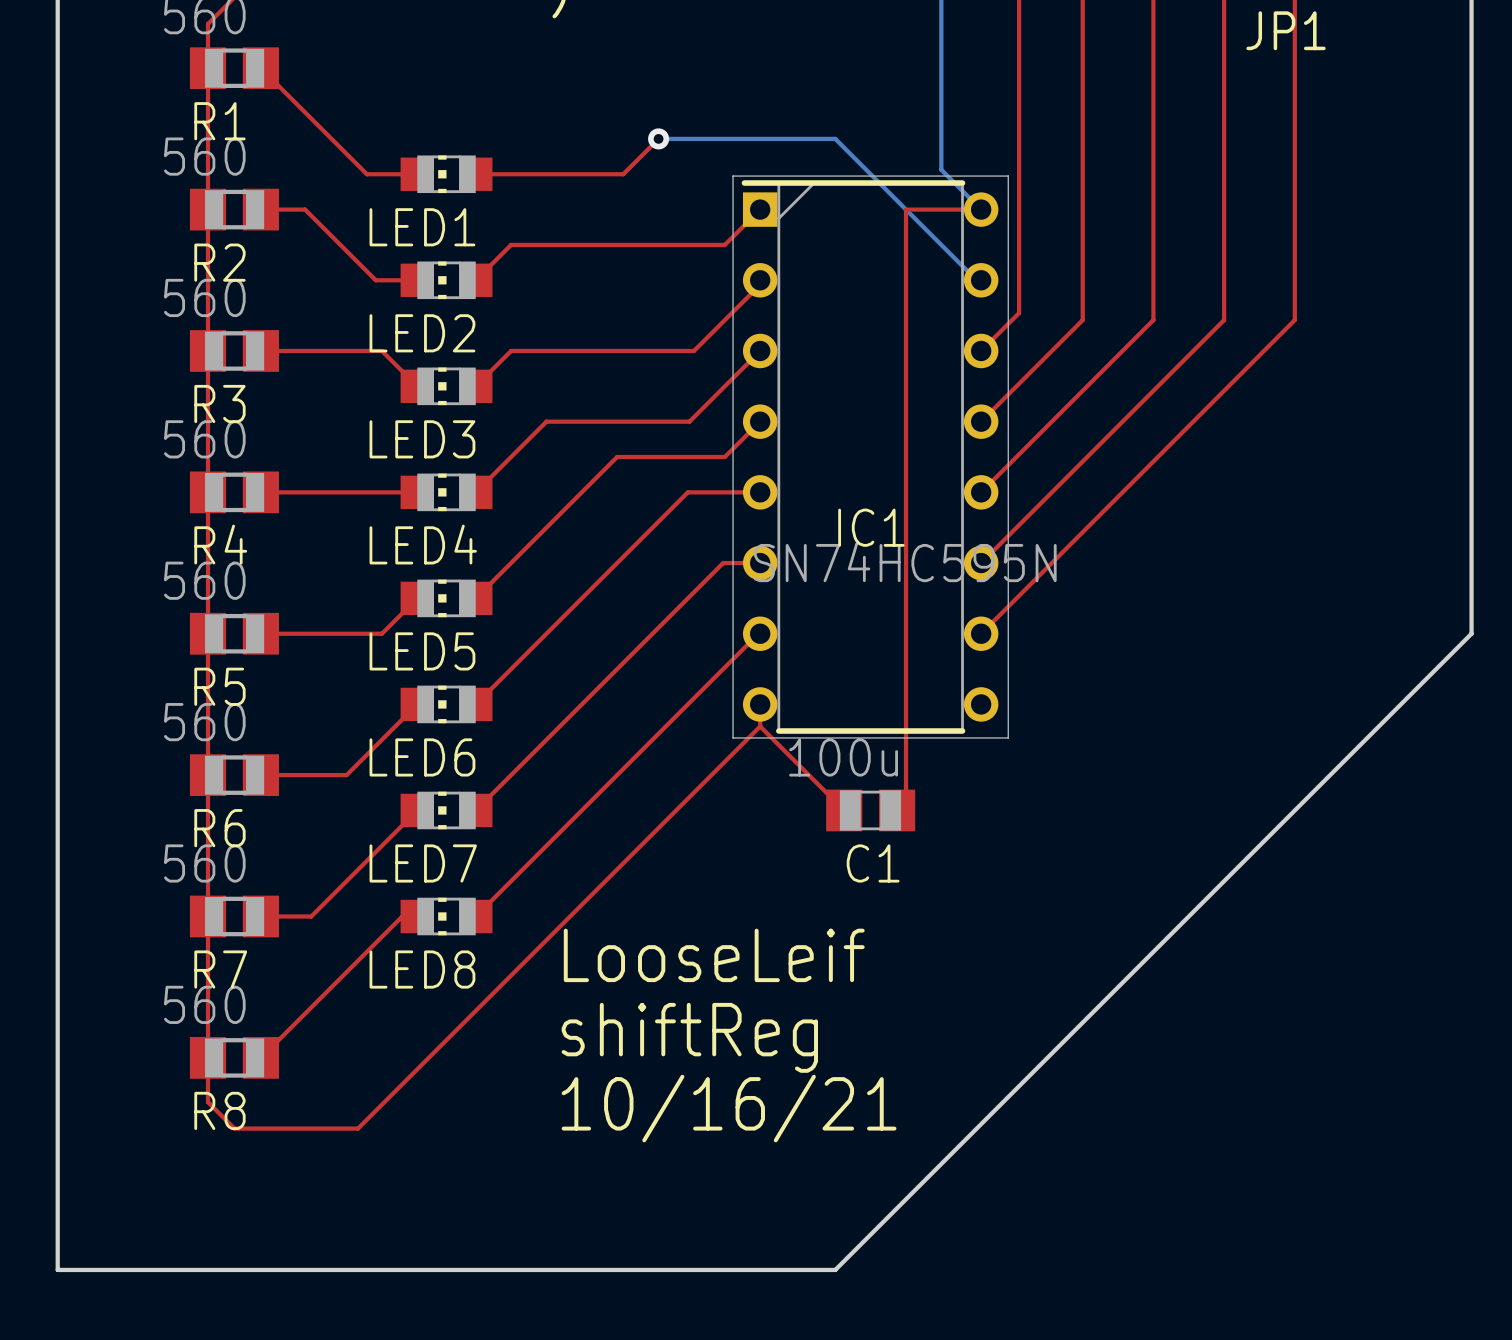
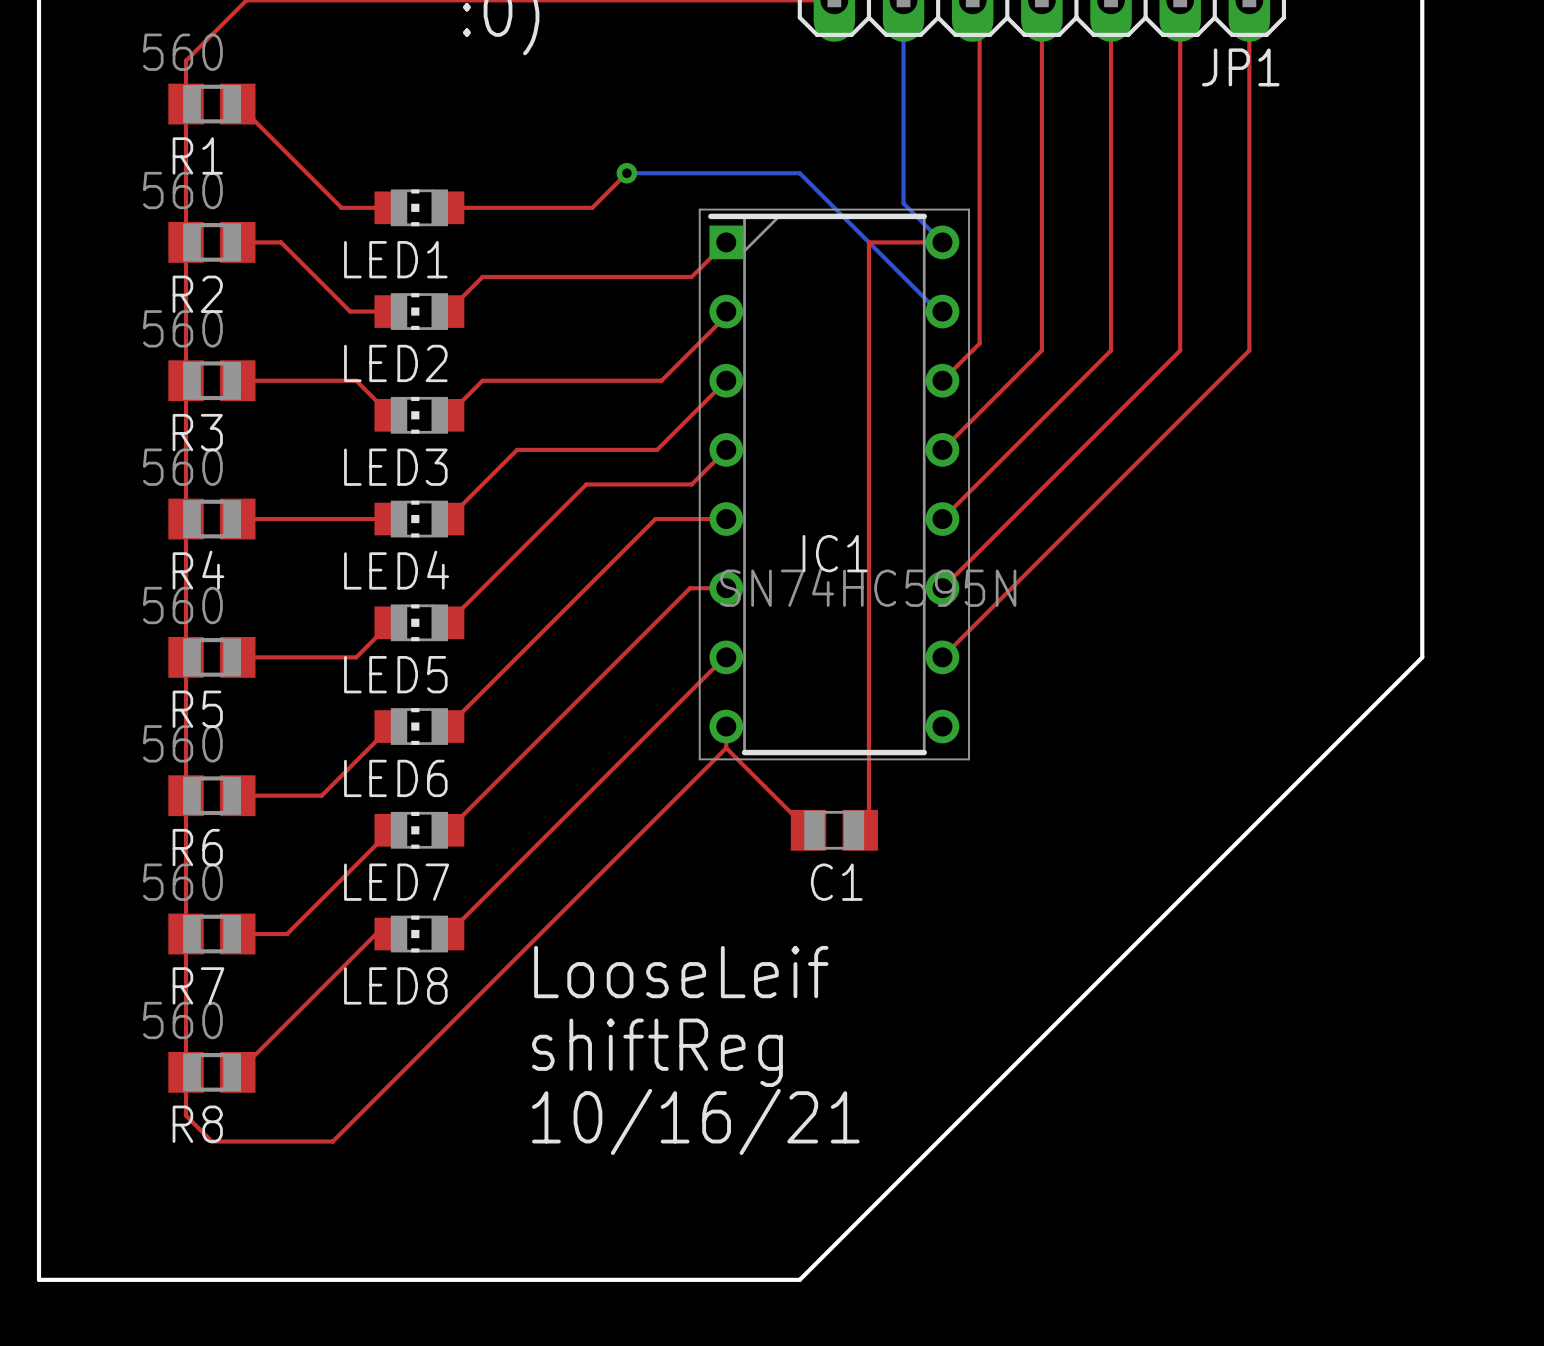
C1 value: 100u (843, 757) -> none

